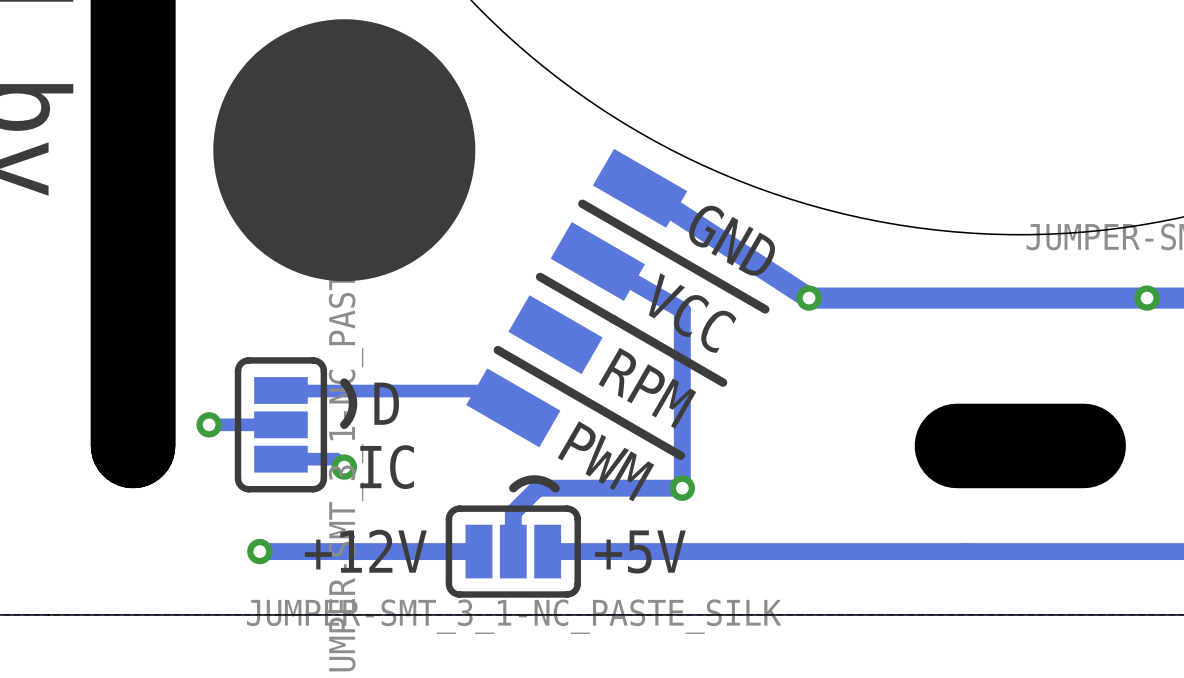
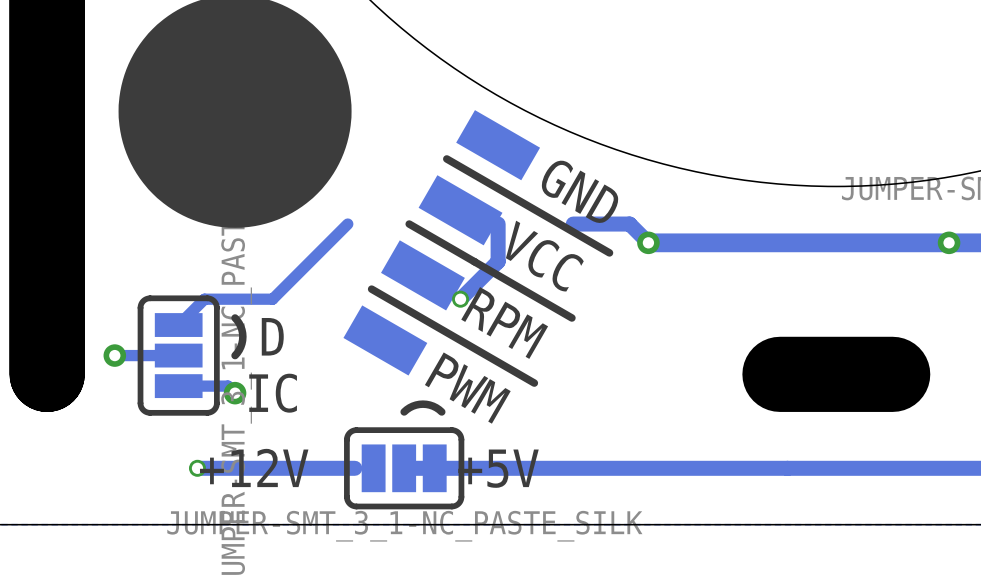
track: (640, 188) (809, 298) -> (573, 224) (629, 224) (648, 242)
track: (597, 261) (682, 310) (682, 488) (537, 488) (513, 512) (513, 551) -> none
track: none -> (498, 224) (498, 261) (460, 299)
via: none -> (460, 299)
track: (281, 391) (482, 391) (513, 407) -> (178, 325) (204, 299) (272, 299) (347, 224)
line: (555, 488) (545, 481) (534, 479) (523, 481) (513, 488) -> (441, 411) (433, 406) (422, 404) (412, 406) (404, 411)
via: (682, 488) -> none
via: (259, 551) -> none
track: (302, 551) (259, 551) -> none
via: none -> (197, 468)
part position: (513, 551) -> (404, 468)

